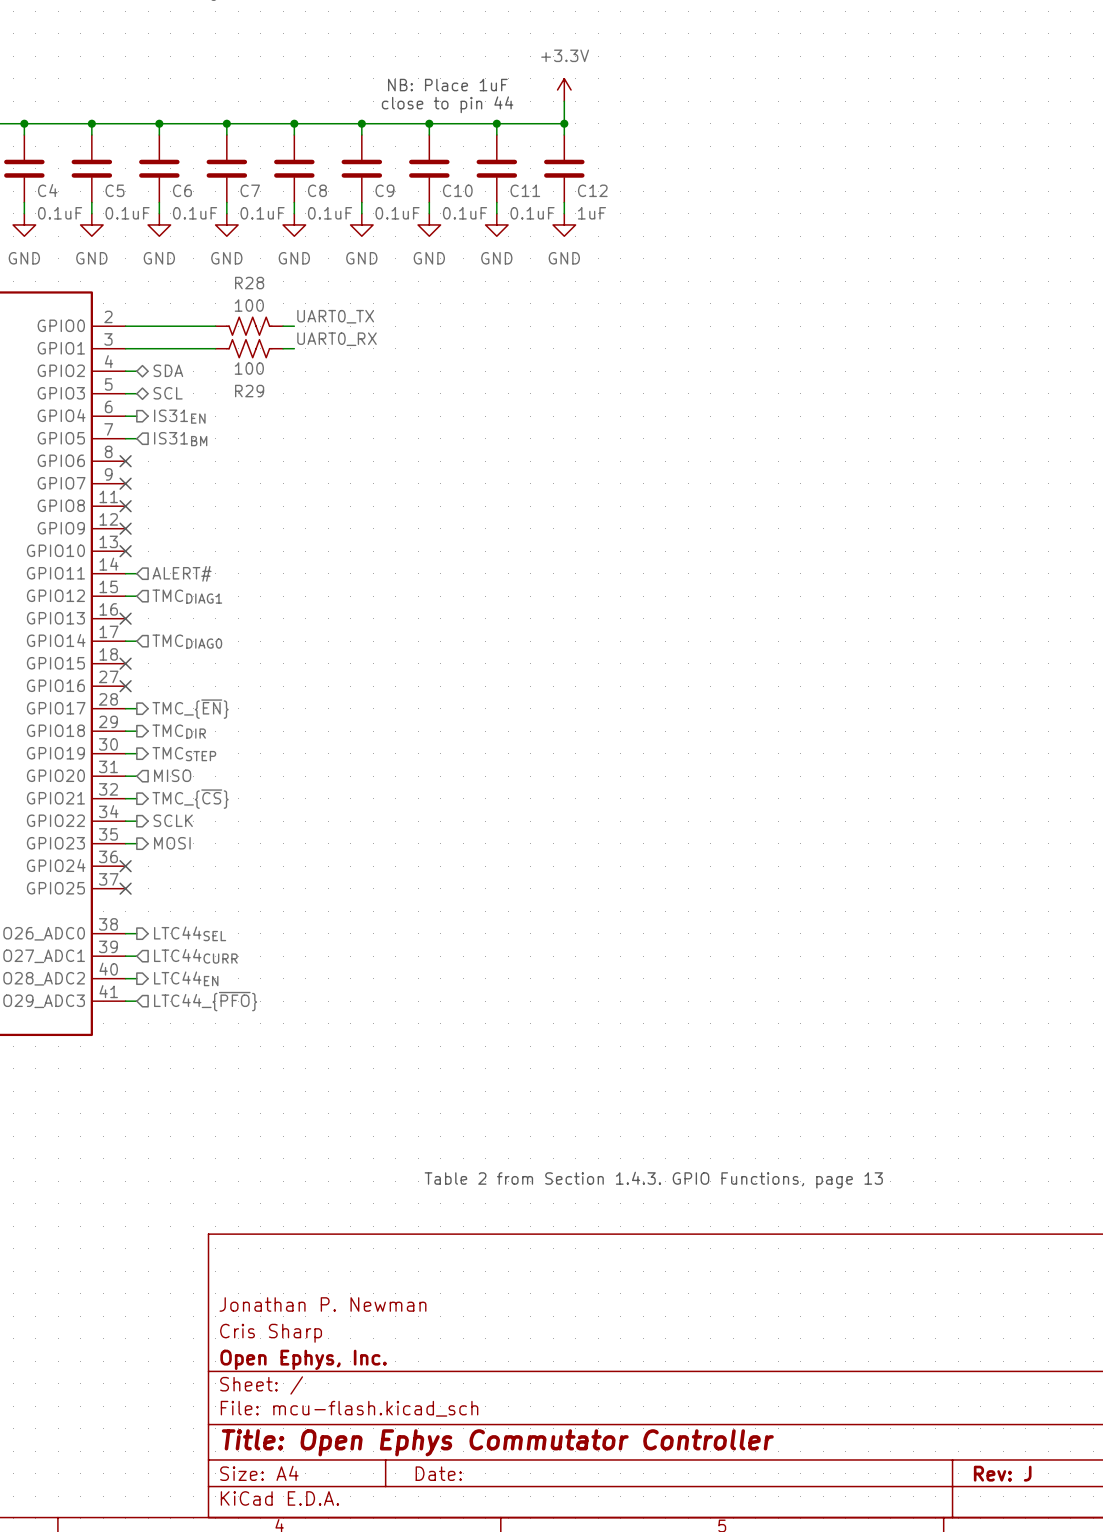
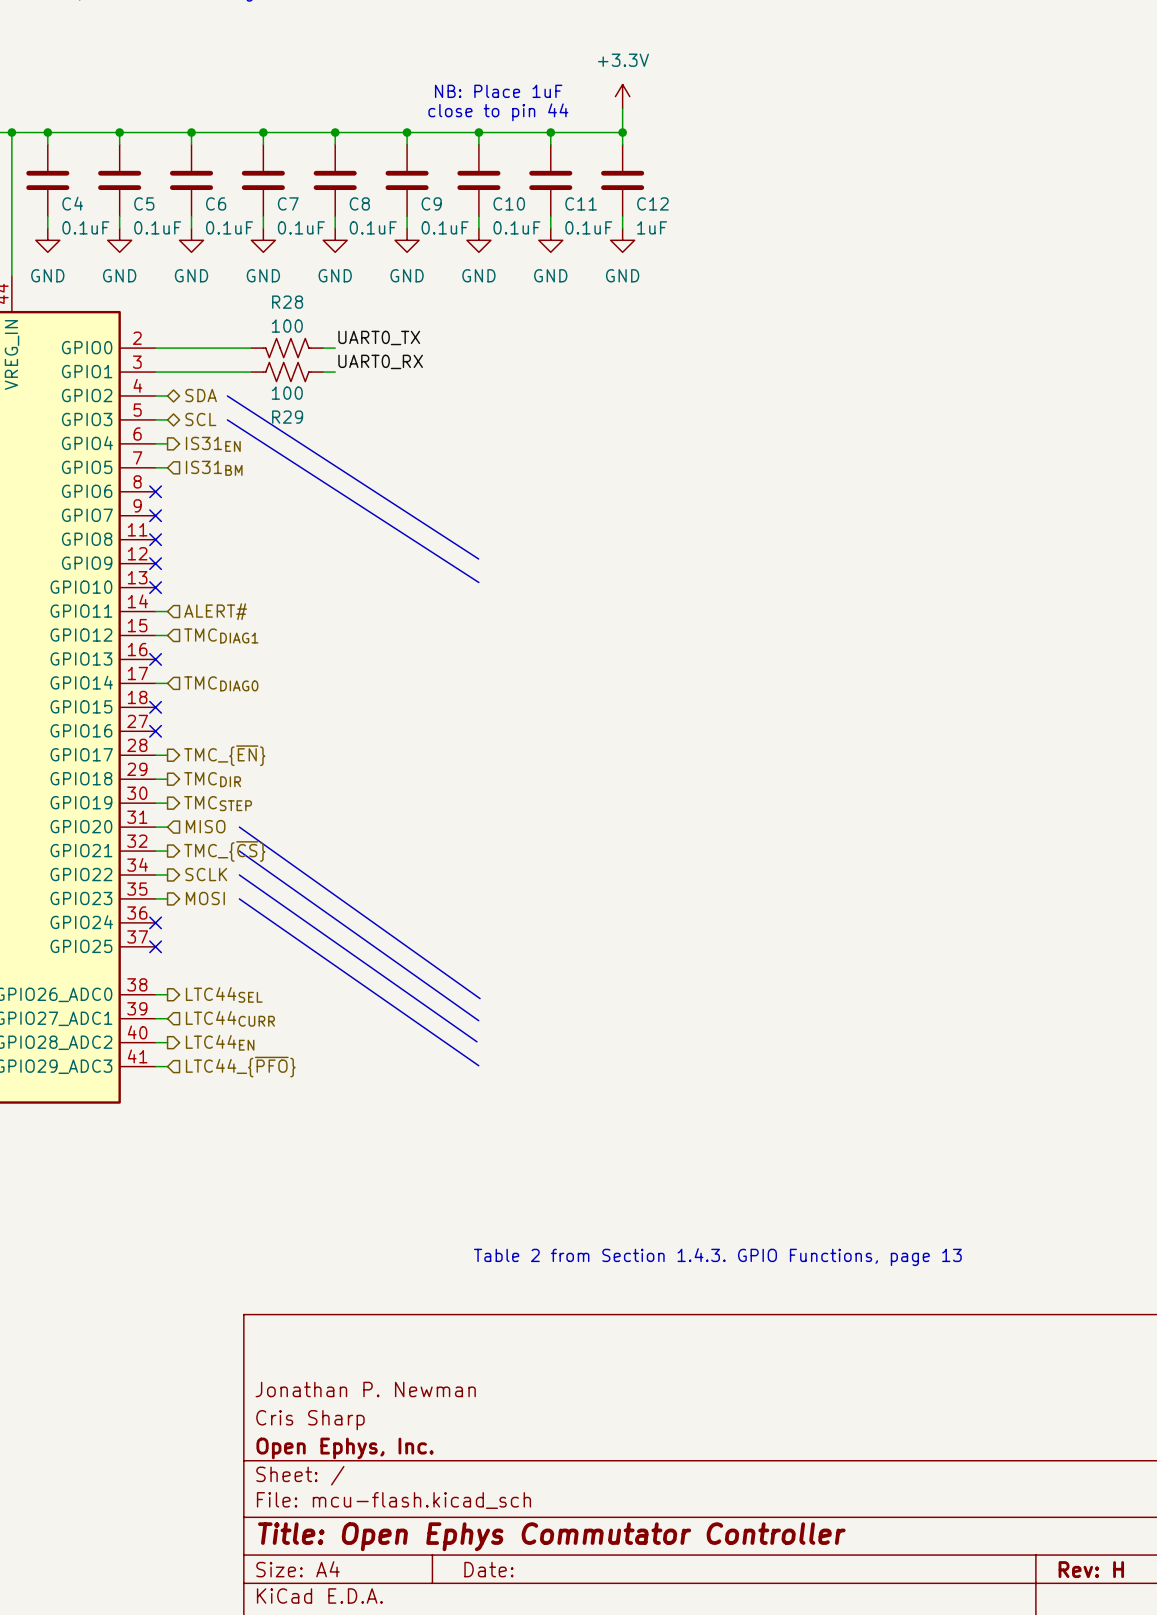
line: none -> (227, 395) (478, 558)
line: none -> (227, 419) (478, 582)
line: none -> (239, 827) (480, 998)
line: none -> (239, 851) (478, 1020)
line: none -> (239, 874) (476, 1041)
line: none -> (239, 898) (478, 1065)
title block: Rev: J (1002, 1473) -> Rev: H (1091, 1569)

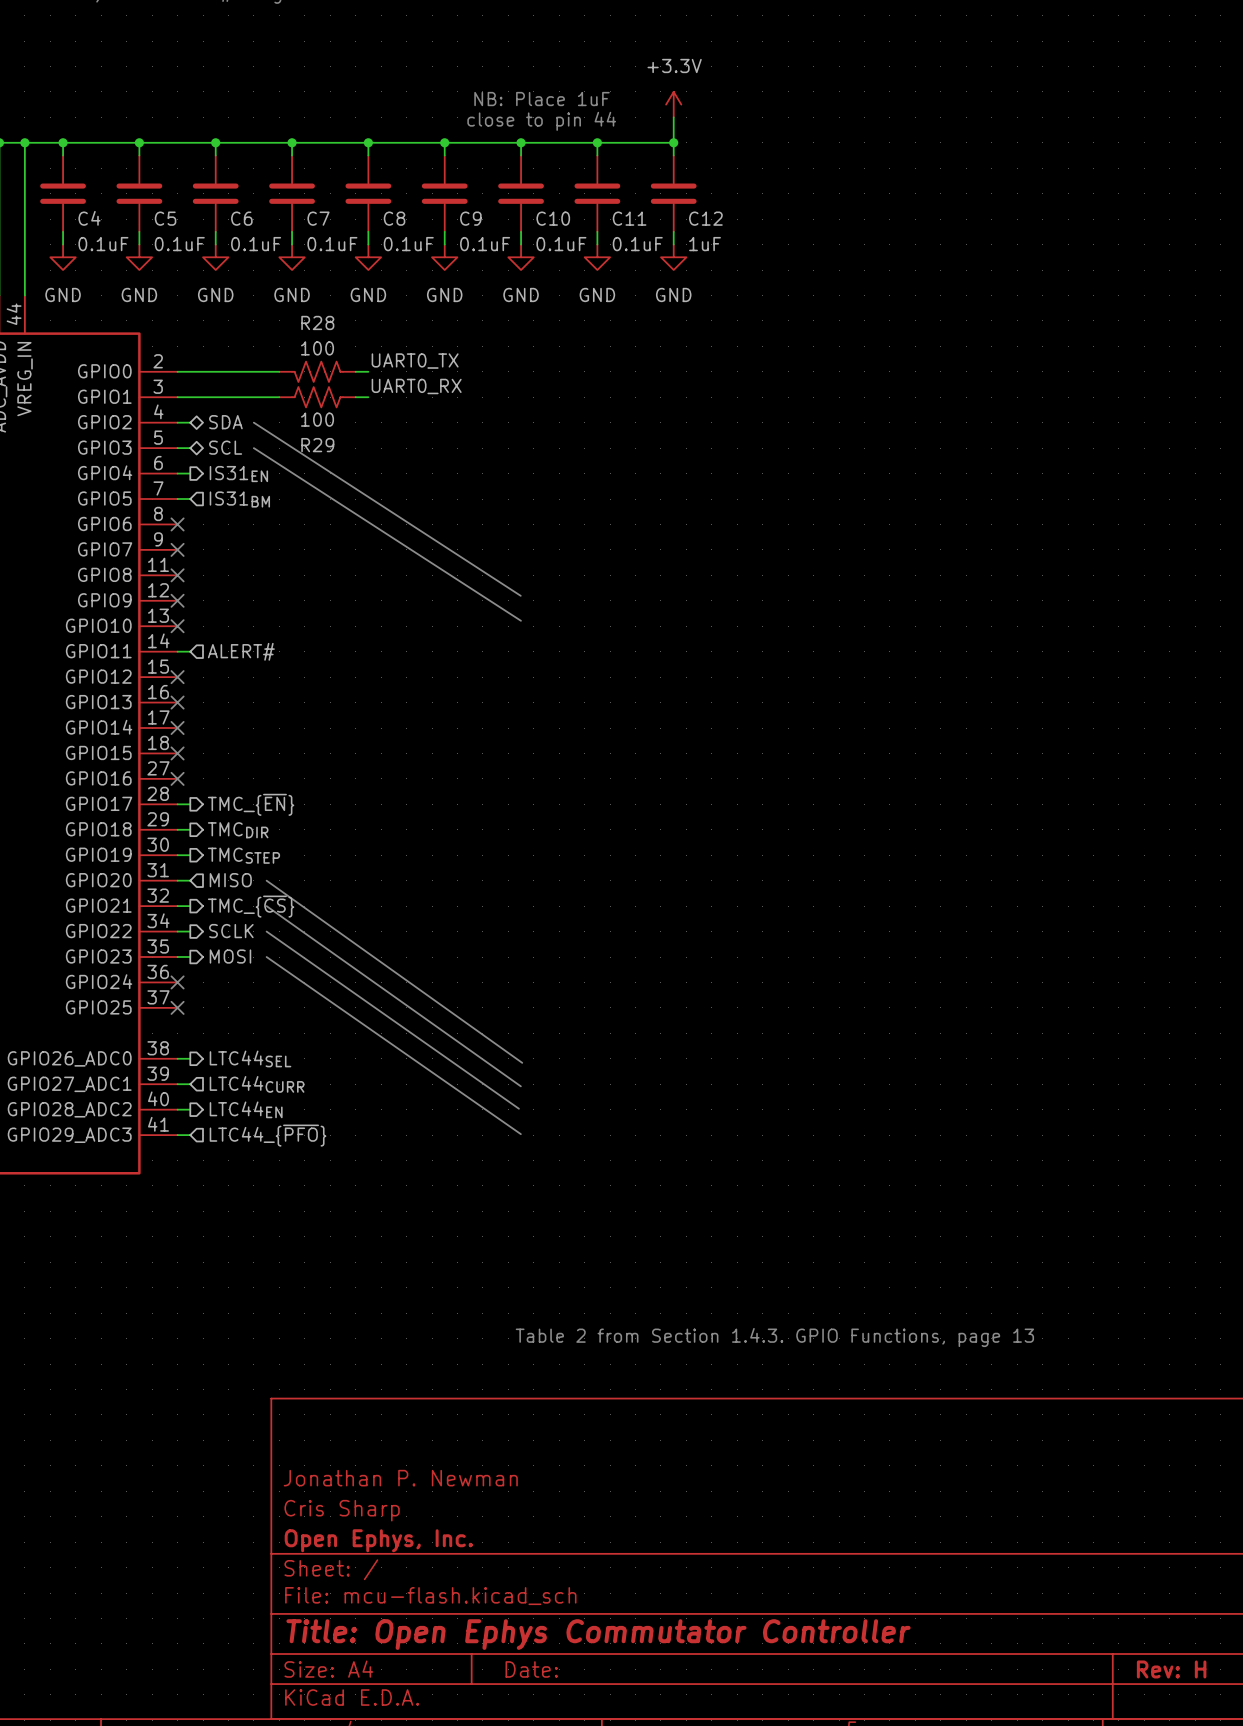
wire: (155, 635) (167, 635) -> none
no-connect mark: none -> (177, 677)
hierarchical label: TMCDIAG1 (221, 635) -> none
wire: (155, 683) (167, 683) -> none
no-connect mark: none -> (177, 728)
hierarchical label: TMCDIAG0 (221, 683) -> none

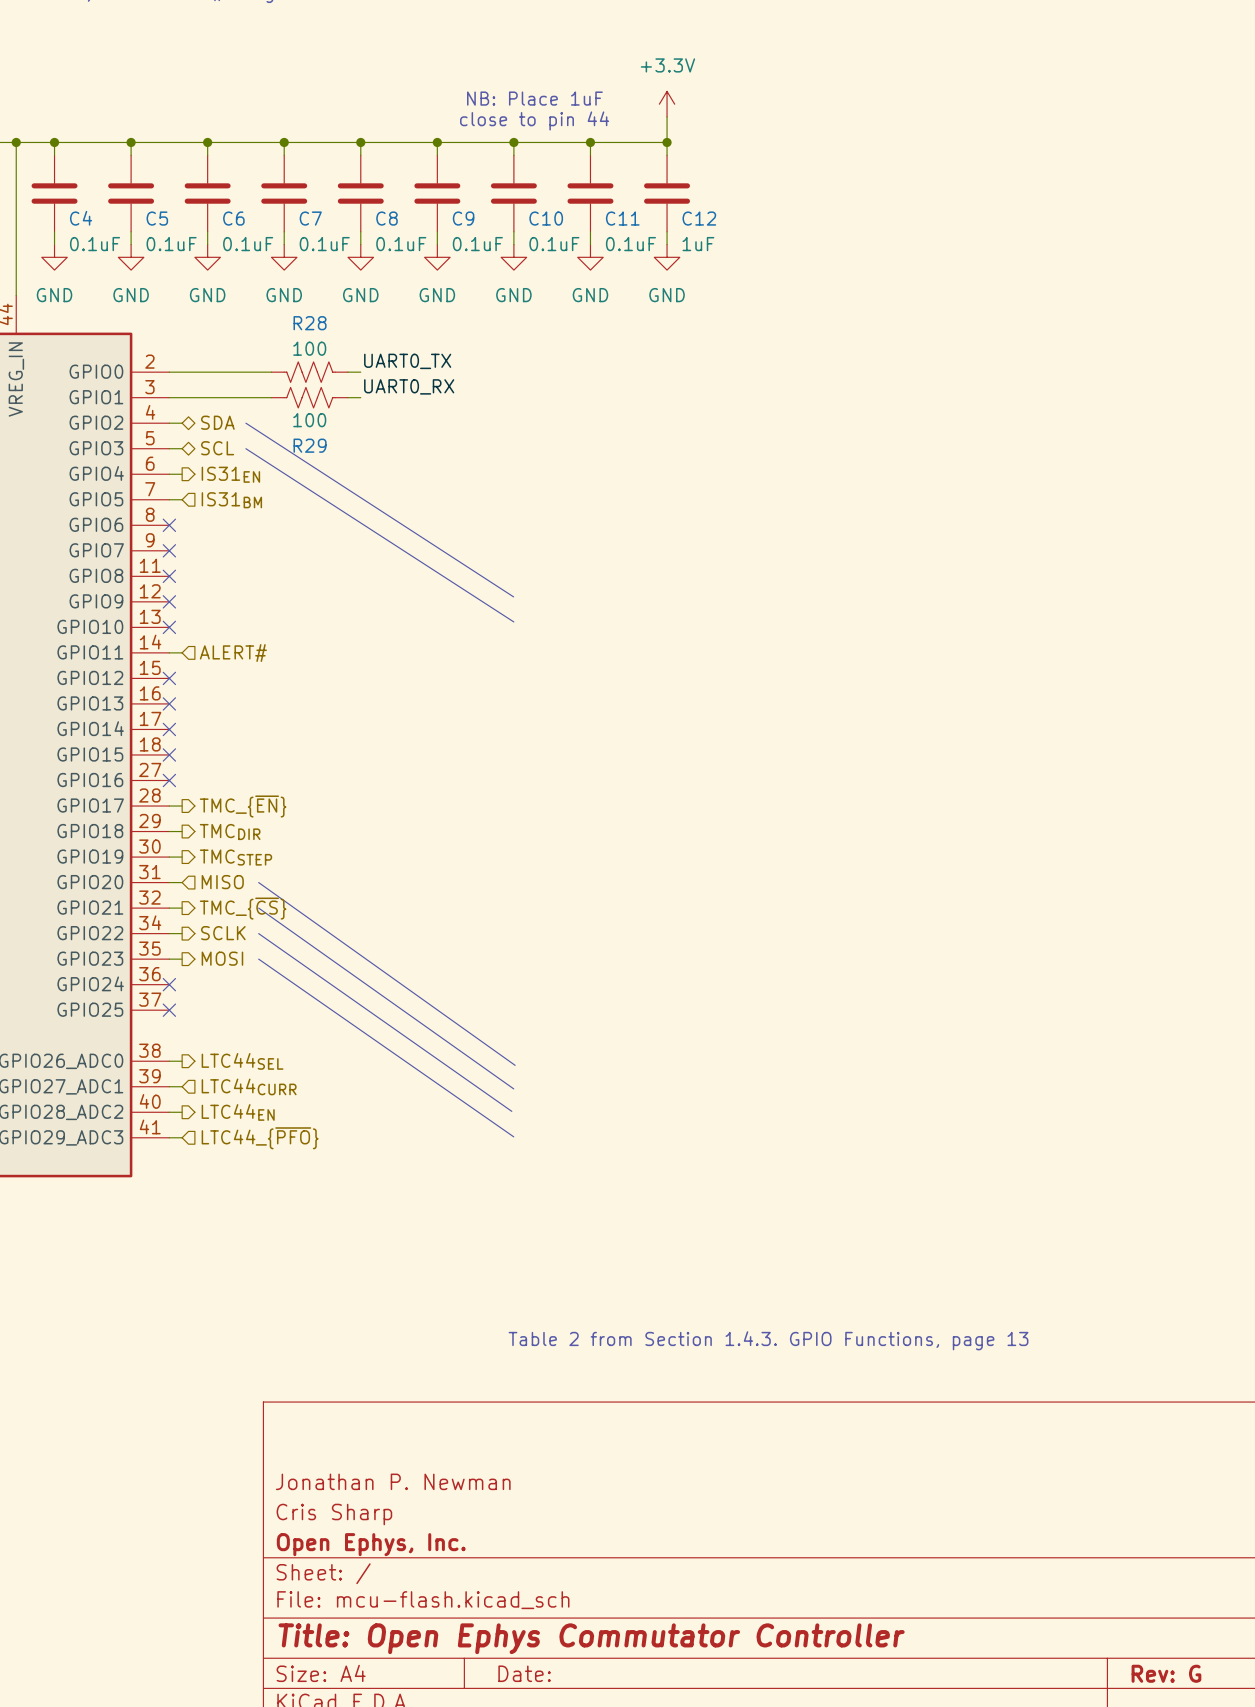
title block: Rev: H (1171, 1669) -> Rev: G (1166, 1673)

